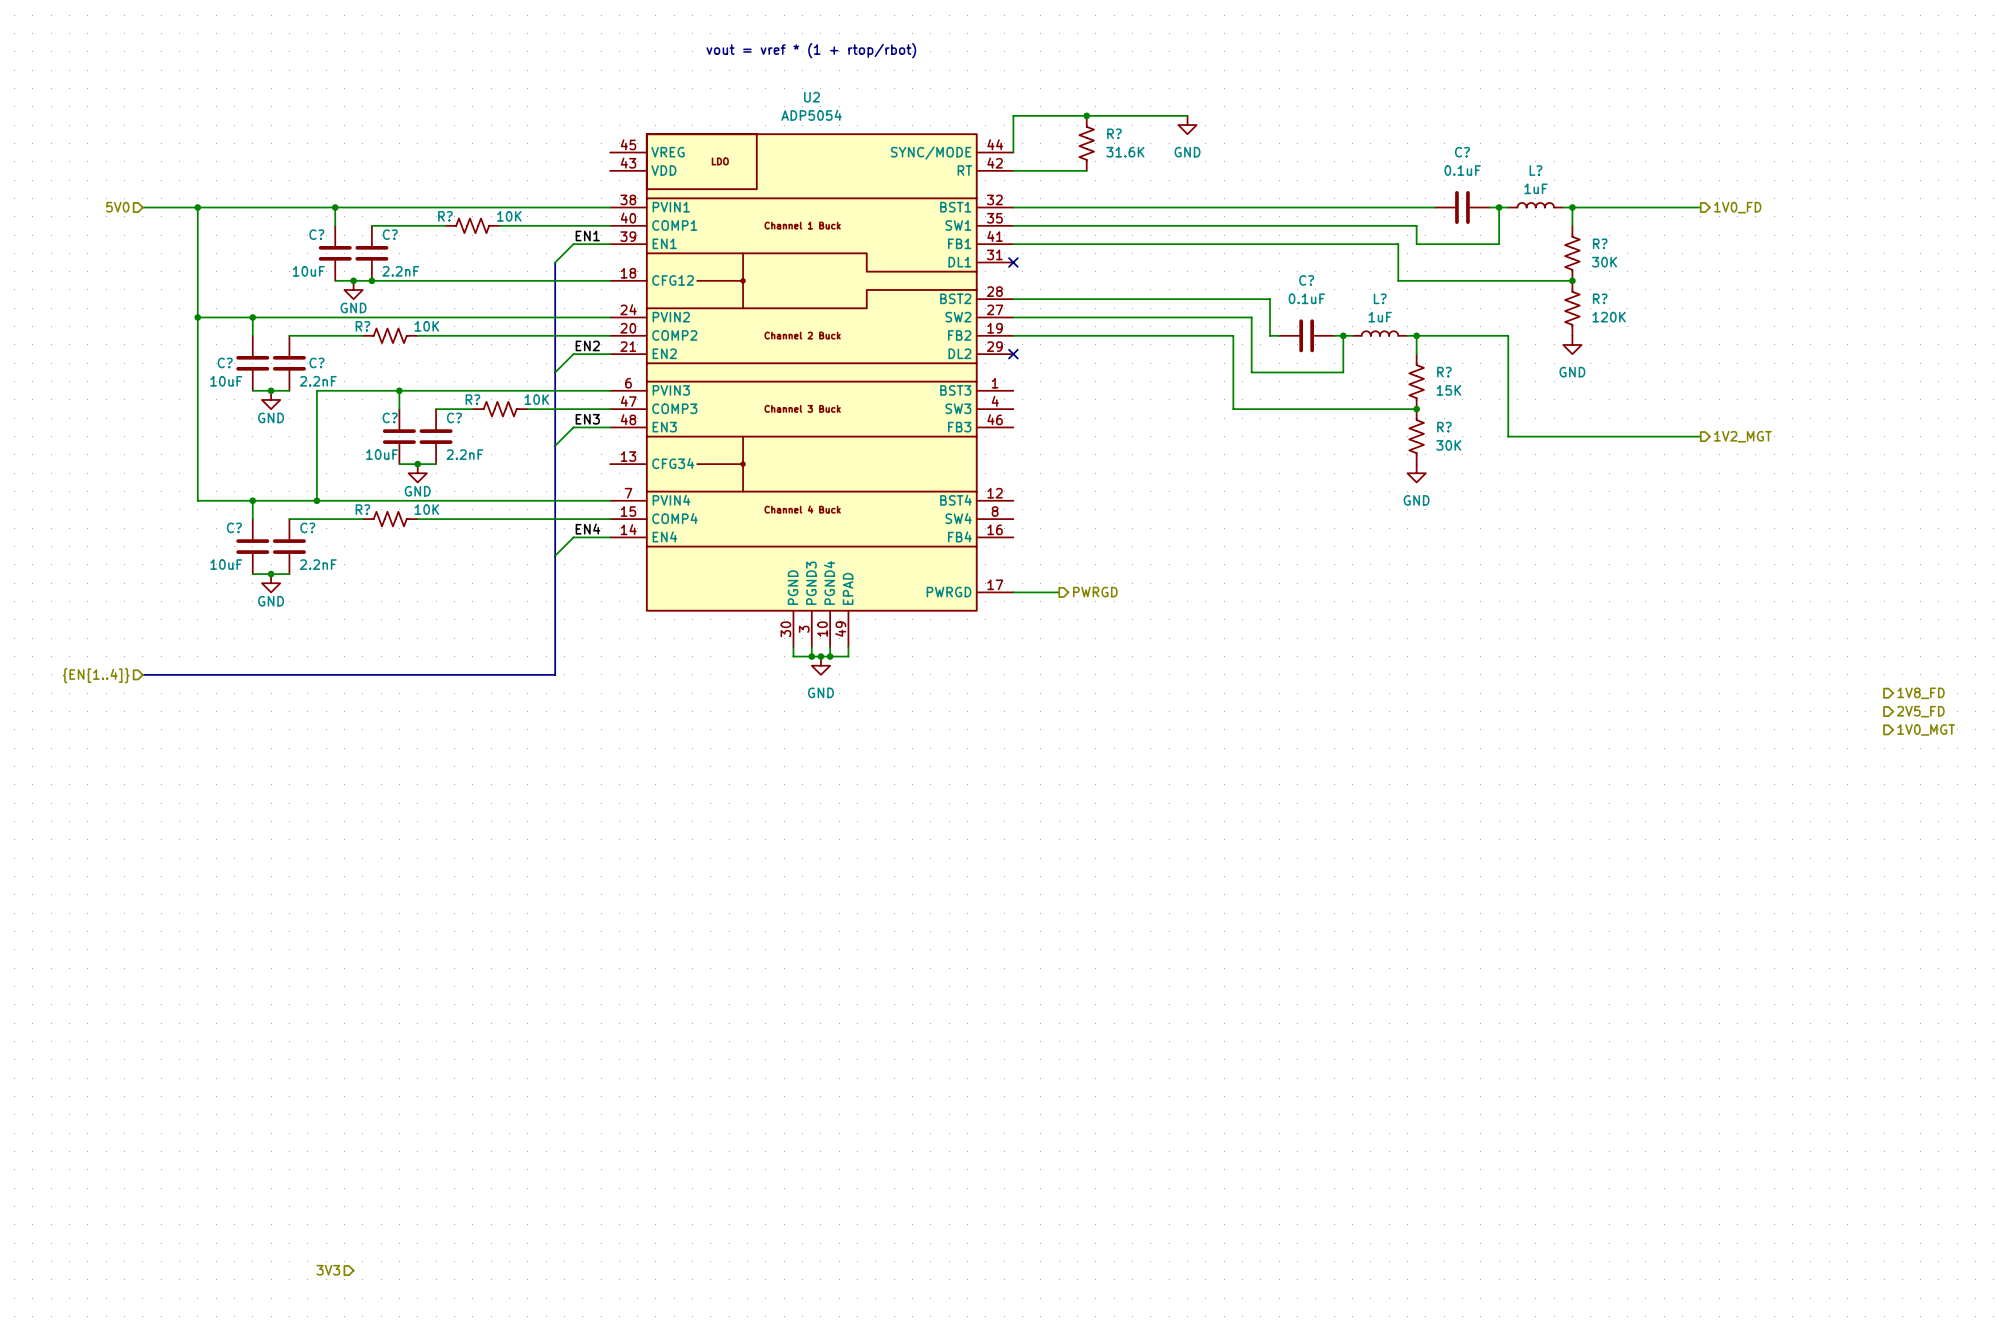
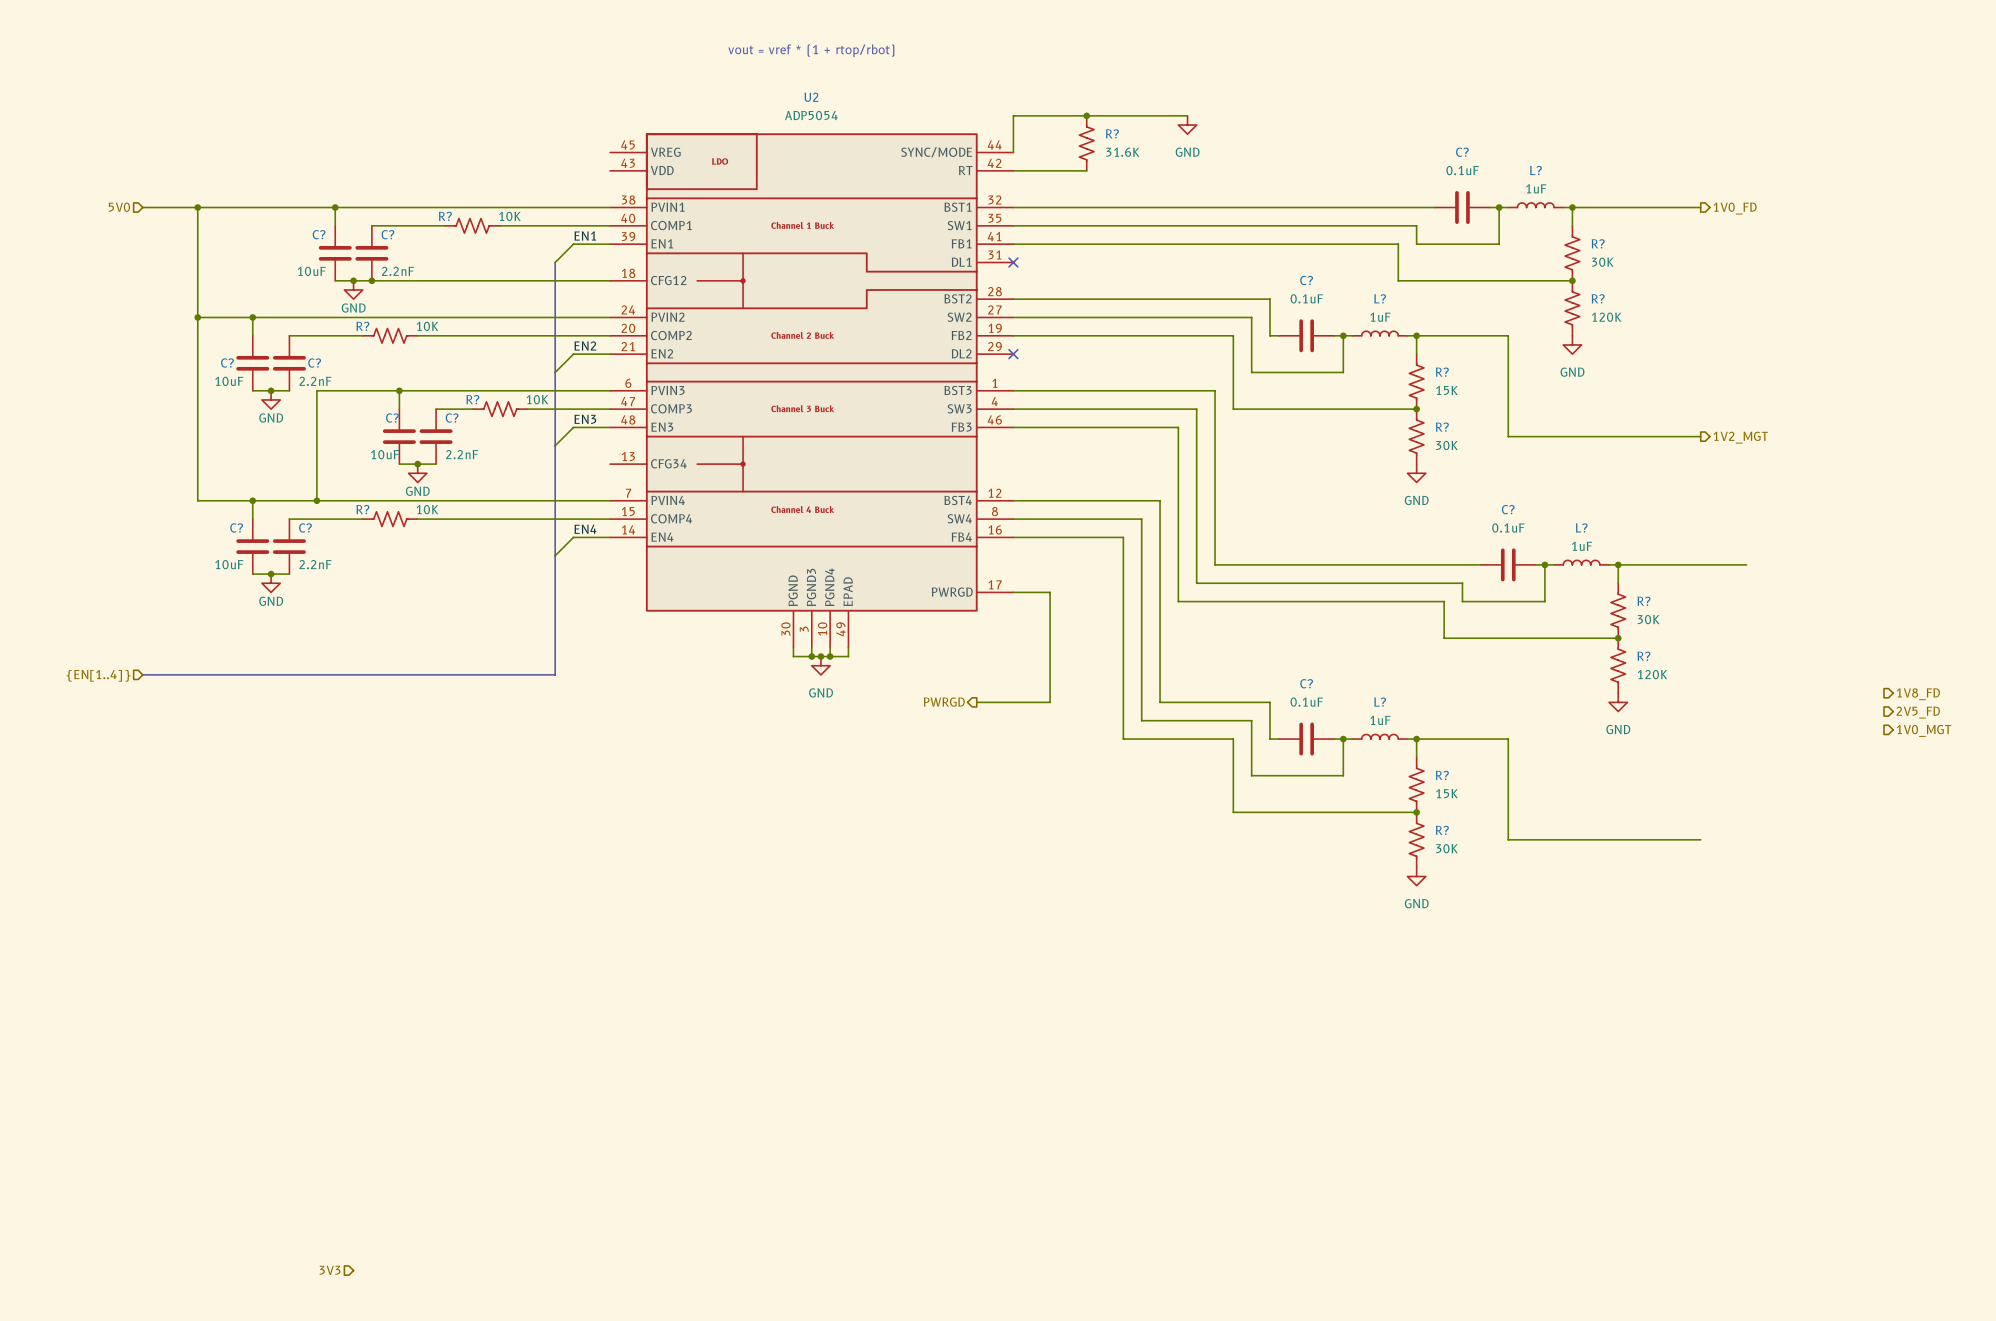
wire: none -> (1013, 390) (1215, 390) (1215, 564) (1480, 564)
wire: none -> (1013, 409) (1196, 409) (1196, 583) (1462, 583) (1462, 601) (1544, 601) (1544, 564)
wire: none -> (1013, 427) (1178, 427) (1178, 601) (1444, 601) (1444, 638) (1618, 638)
wire: none -> (1013, 500) (1160, 500) (1160, 702) (1270, 702) (1270, 739) (1279, 739)
wire: none -> (1013, 519) (1141, 519) (1141, 720) (1251, 720) (1251, 775) (1343, 775) (1343, 739)
wire: none -> (1013, 537) (1123, 537) (1123, 739) (1233, 739) (1233, 812) (1416, 812)
L?: none -> 1uF (1581, 562)
C?: none -> 0.1uF (1508, 564)
wire: none -> (1535, 564) (1554, 564)
junction: none -> (1544, 564)
wire: none -> (1609, 564) (1746, 564)
wire: none -> (1618, 564) (1618, 583)
junction: none -> (1618, 564)
wire: (1050, 592) (1059, 592) -> (1050, 592) (1050, 702) (976, 702)
hierarchical label rotation: 0° (1095, 592) -> 180° (944, 702)
hierarchical label position: PWRGD (1095, 592) -> PWRGD (944, 702)
R?: none -> 30K (1618, 610)
junction: none -> (1618, 638)
R?: none -> 120K (1618, 665)
power symbol: none -> GND (1618, 702)
L?: none -> 1uF (1379, 736)
C?: none -> 0.1uF (1306, 739)
wire: none -> (1334, 739) (1352, 739)
junction: none -> (1343, 739)
wire: none -> (1407, 739) (1508, 739) (1508, 839) (1700, 839)
wire: none -> (1416, 739) (1416, 757)
junction: none -> (1416, 739)
R?: none -> 15K (1416, 784)
junction: none -> (1416, 812)
R?: none -> 30K (1416, 839)
power symbol: none -> GND (1416, 876)

